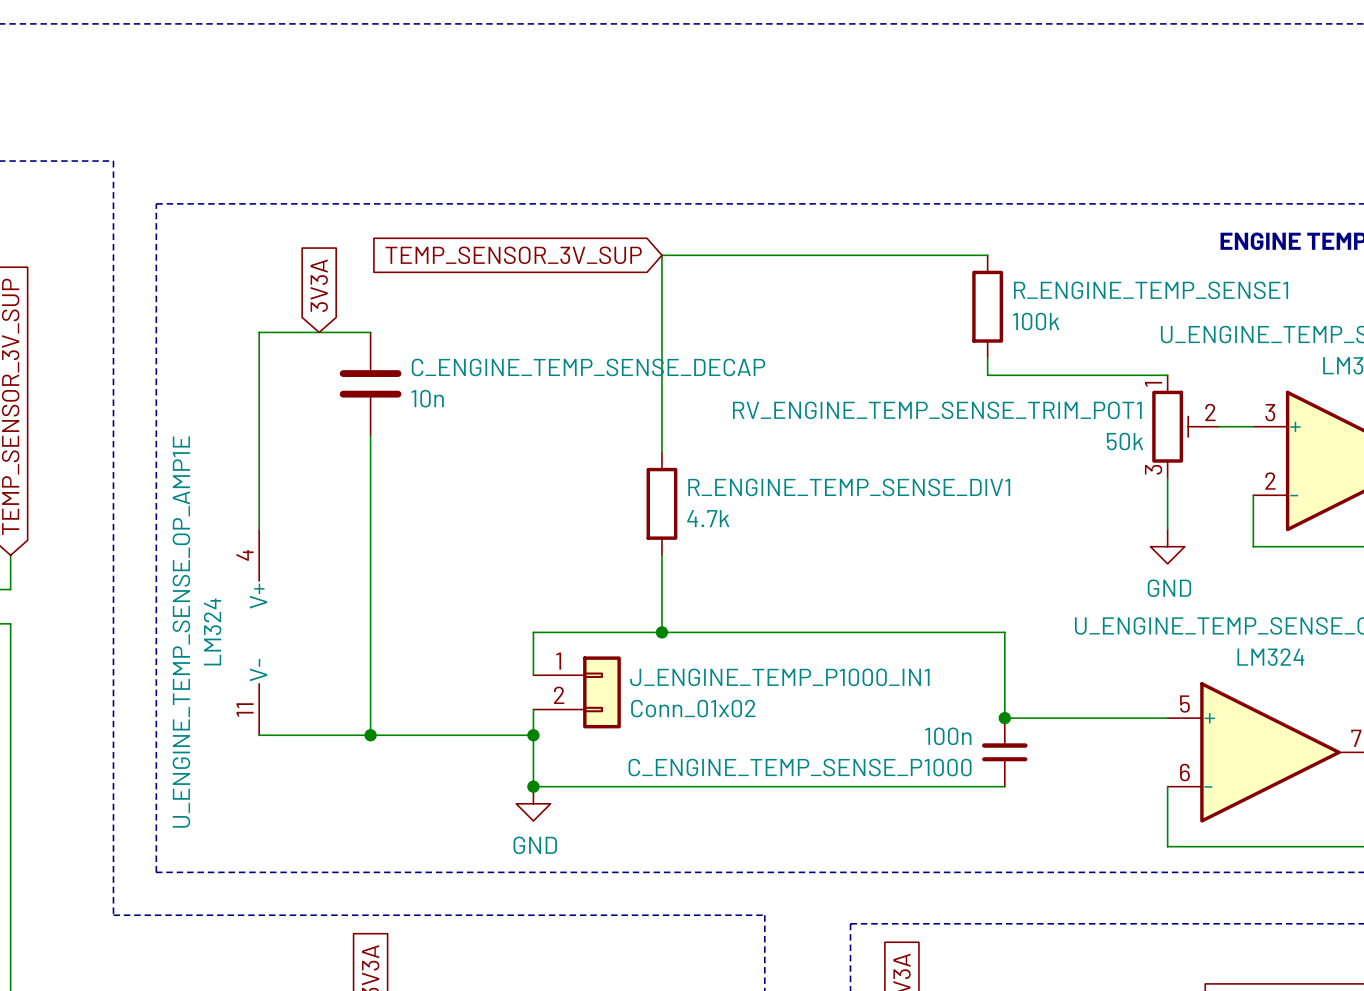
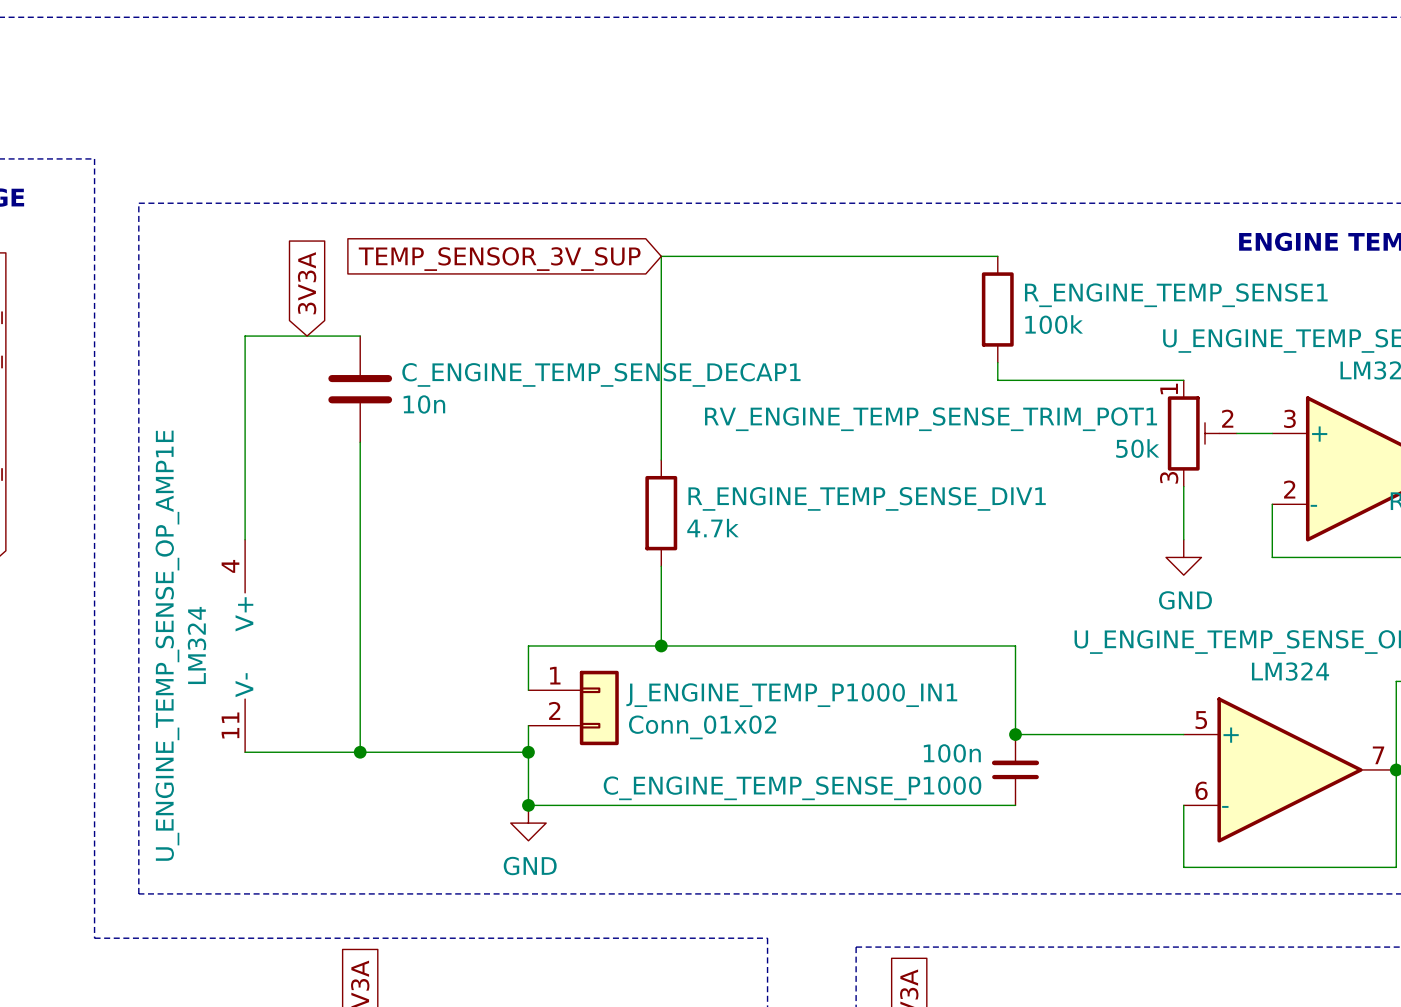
C_ENGINE_TEMP_SENSE_DECAP name: C_ENGINE_TEMP_SENSE_DECAP (588, 367) -> C_ENGINE_TEMP_SENSE_DECAP1 (601, 374)

